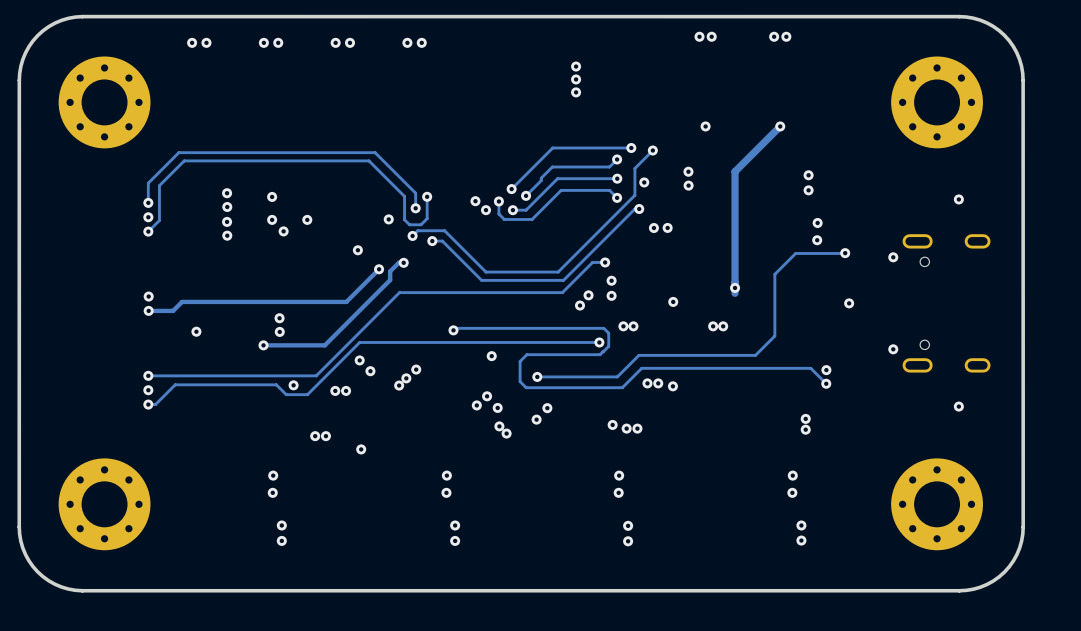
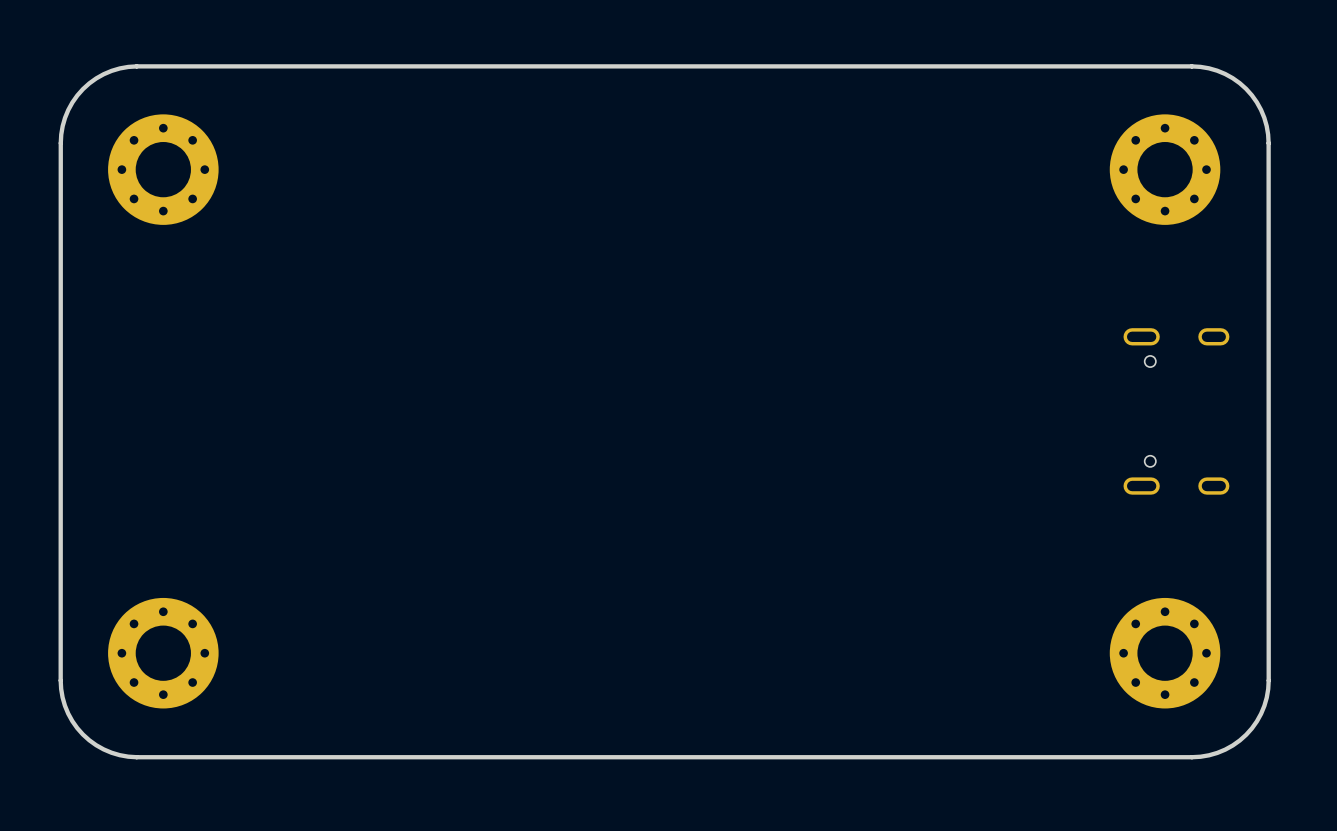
via: (699, 36) -> none
via: (711, 36) -> none
via: (774, 36) -> none
via: (786, 36) -> none
via: (192, 42) -> none
via: (206, 42) -> none
via: (263, 42) -> none
via: (278, 42) -> none
via: (335, 42) -> none
via: (350, 42) -> none
via: (407, 42) -> none
via: (421, 42) -> none
via: (576, 66) -> none
via: (576, 79) -> none
via: (576, 92) -> none
via: (705, 126) -> none
track: (780, 126) (735, 171) (735, 293) -> none
via: (780, 126) -> none
track: (631, 147) (552, 147) (511, 189) (511, 191) -> none
via: (631, 147) -> none
track: (652, 150) (634, 168) (634, 195) (558, 272) (486, 272) (444, 230) (417, 230) (412, 235) -> none
via: (652, 150) -> none
track: (617, 159) (609, 167) (552, 167) (526, 195) -> none
via: (617, 159) -> none
via: (688, 171) -> none
via: (808, 175) -> none
track: (617, 178) (557, 178) (526, 210) (512, 210) -> none
via: (617, 178) -> none
via: (644, 182) -> none
via: (688, 185) -> none
via: (511, 189) -> none
via: (808, 190) -> none
via: (227, 193) -> none
via: (526, 195) -> none
via: (272, 196) -> none
track: (427, 196) (427, 218) (421, 224) (409, 224) (404, 219) (404, 196) (369, 160) (184, 160) (159, 185) (159, 220) (148, 231) -> none
via: (427, 196) -> none
track: (617, 197) (609, 190) (561, 190) (532, 219) (504, 219) (498, 214) (498, 201) -> none
via: (617, 197) -> none
via: (958, 199) -> none
via: (475, 201) -> none
via: (498, 201) -> none
track: (148, 202) (148, 183) (178, 152) (375, 152) (415, 193) (415, 208) -> none
via: (148, 202) -> none
via: (227, 206) -> none
via: (415, 208) -> none
track: (639, 209) (634, 209) (563, 280) (481, 280) (442, 241) (432, 241) -> none
via: (639, 209) -> none
via: (485, 210) -> none
via: (512, 210) -> none
via: (148, 217) -> none
via: (272, 219) -> none
via: (307, 219) -> none
via: (388, 219) -> none
via: (227, 221) -> none
via: (817, 222) -> none
via: (667, 227) -> none
via: (653, 228) -> none
via: (148, 231) -> none
via: (283, 231) -> none
via: (227, 235) -> none
via: (412, 235) -> none
via: (817, 240) -> none
via: (432, 241) -> none
via: (357, 250) -> none
track: (845, 253) (795, 253) (774, 274) (774, 336) (755, 355) (638, 355) (617, 376) (537, 376) -> none
via: (845, 253) -> none
via: (893, 257) -> none
track: (403, 262) (398, 262) (390, 271) (390, 280) (324, 345) (263, 345) -> none
via: (403, 262) -> none
track: (605, 262) (592, 262) (562, 292) (399, 292) (316, 375) (148, 375) -> none
via: (605, 262) -> none
track: (379, 269) (346, 301) (182, 301) (173, 310) (148, 310) -> none
via: (379, 269) -> none
via: (611, 280) -> none
via: (735, 287) -> none
via: (588, 295) -> none
via: (611, 295) -> none
via: (148, 296) -> none
via: (673, 301) -> none
via: (849, 303) -> none
via: (580, 305) -> none
via: (148, 310) -> none
via: (279, 318) -> none
via: (623, 326) -> none
via: (633, 326) -> none
via: (713, 326) -> none
via: (723, 326) -> none
track: (453, 330) (455, 328) (603, 328) (608, 333) (608, 346) (603, 351) -> none
via: (453, 330) -> none
via: (196, 331) -> none
via: (279, 331) -> none
track: (599, 342) (359, 342) (307, 394) (286, 394) (276, 384) (175, 384) (155, 404) (148, 404) -> none
via: (599, 342) -> none
via: (263, 345) -> none
via: (893, 349) -> none
track: (602, 351) (600, 354) (526, 354) (520, 361) (520, 381) (526, 387) (622, 387) (641, 368) (810, 368) (826, 383) -> none
via: (491, 356) -> none
via: (359, 360) -> none
via: (416, 369) -> none
via: (826, 370) -> none
via: (370, 371) -> none
via: (148, 375) -> none
via: (537, 376) -> none
via: (406, 378) -> none
via: (647, 383) -> none
via: (658, 383) -> none
via: (826, 383) -> none
via: (293, 385) -> none
via: (399, 385) -> none
via: (672, 386) -> none
via: (148, 390) -> none
via: (335, 390) -> none
via: (346, 390) -> none
via: (487, 396) -> none
via: (148, 404) -> none
via: (476, 405) -> none
via: (958, 406) -> none
via: (497, 407) -> none
via: (547, 408) -> none
via: (805, 418) -> none
via: (536, 419) -> none
via: (612, 424) -> none
via: (499, 426) -> none
via: (626, 428) -> none
via: (637, 428) -> none
via: (805, 429) -> none
via: (506, 433) -> none
via: (315, 436) -> none
via: (325, 436) -> none
via: (361, 449) -> none
via: (273, 475) -> none
via: (446, 475) -> none
via: (619, 475) -> none
via: (792, 475) -> none
via: (272, 492) -> none
via: (446, 492) -> none
via: (618, 492) -> none
via: (792, 492) -> none
via: (281, 525) -> none
via: (455, 525) -> none
via: (628, 525) -> none
via: (801, 525) -> none
via: (281, 540) -> none
via: (455, 540) -> none
via: (801, 540) -> none
via: (628, 541) -> none

